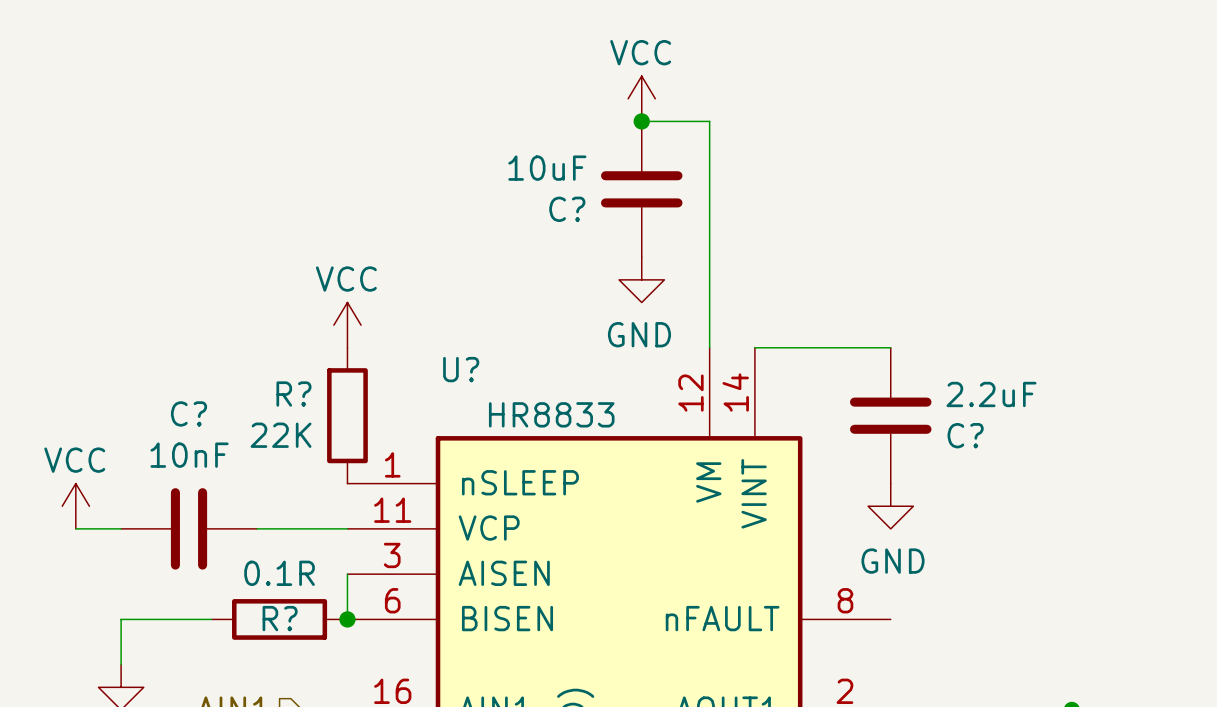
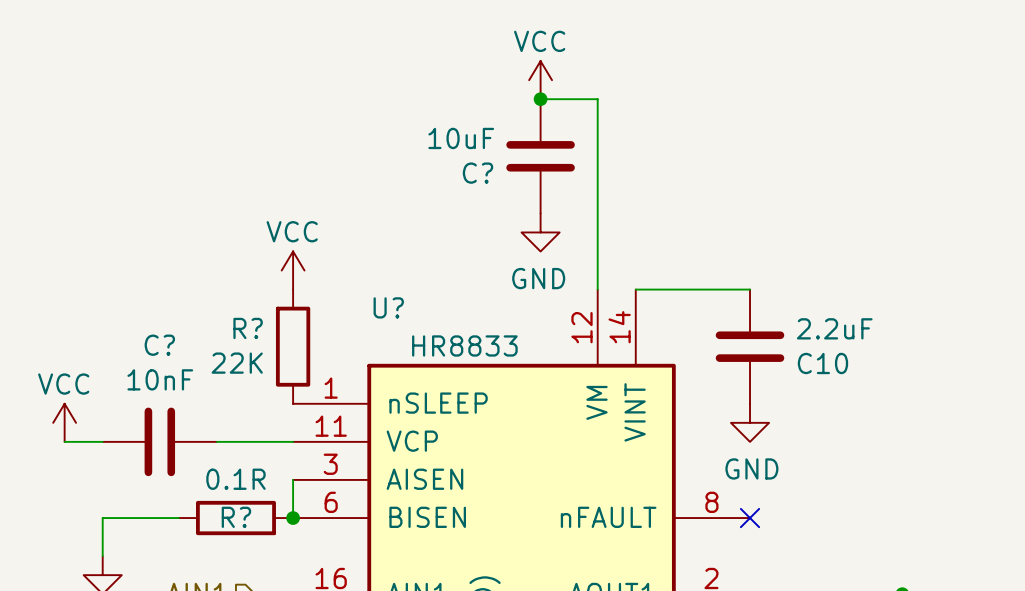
C? name: C? (965, 435) -> C10 (822, 363)
no-connect mark: none -> (750, 518)

